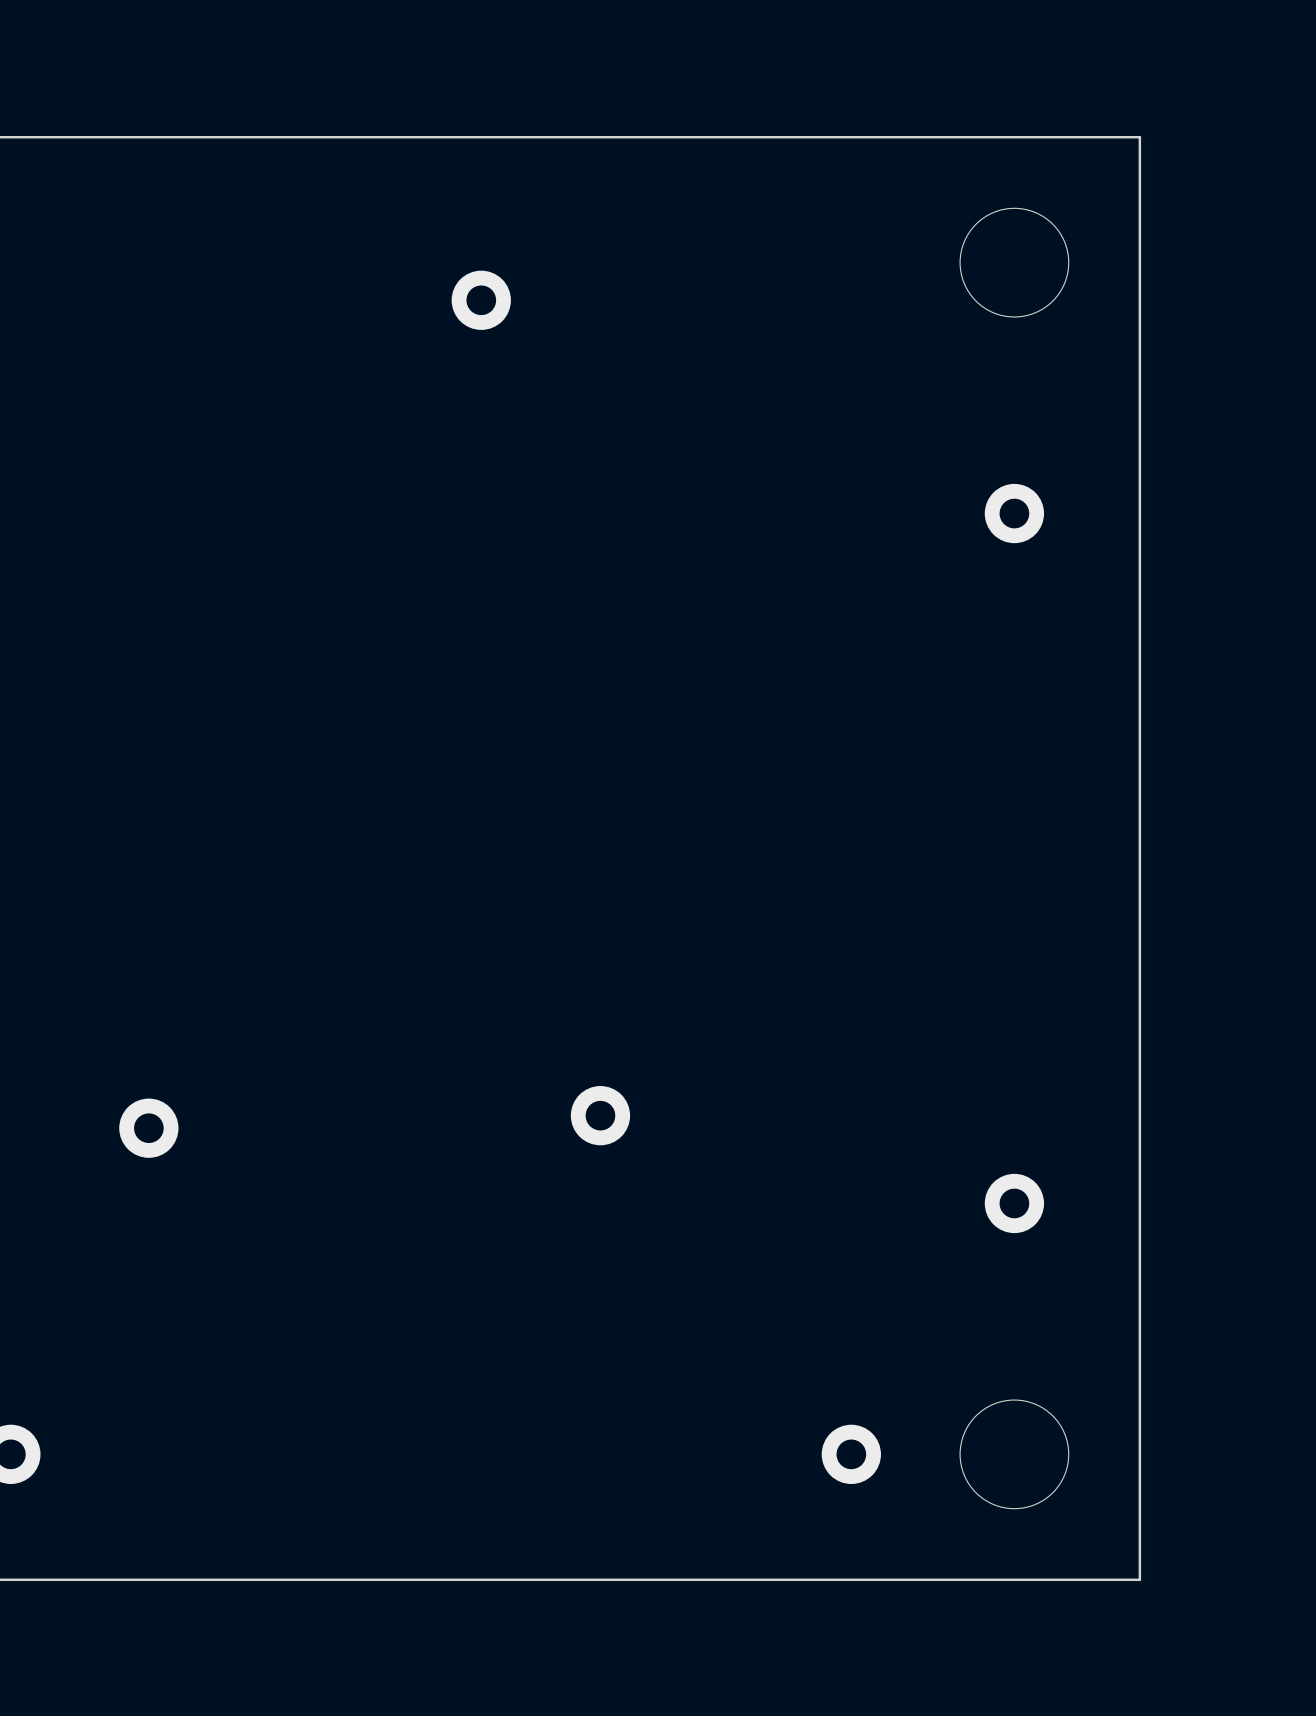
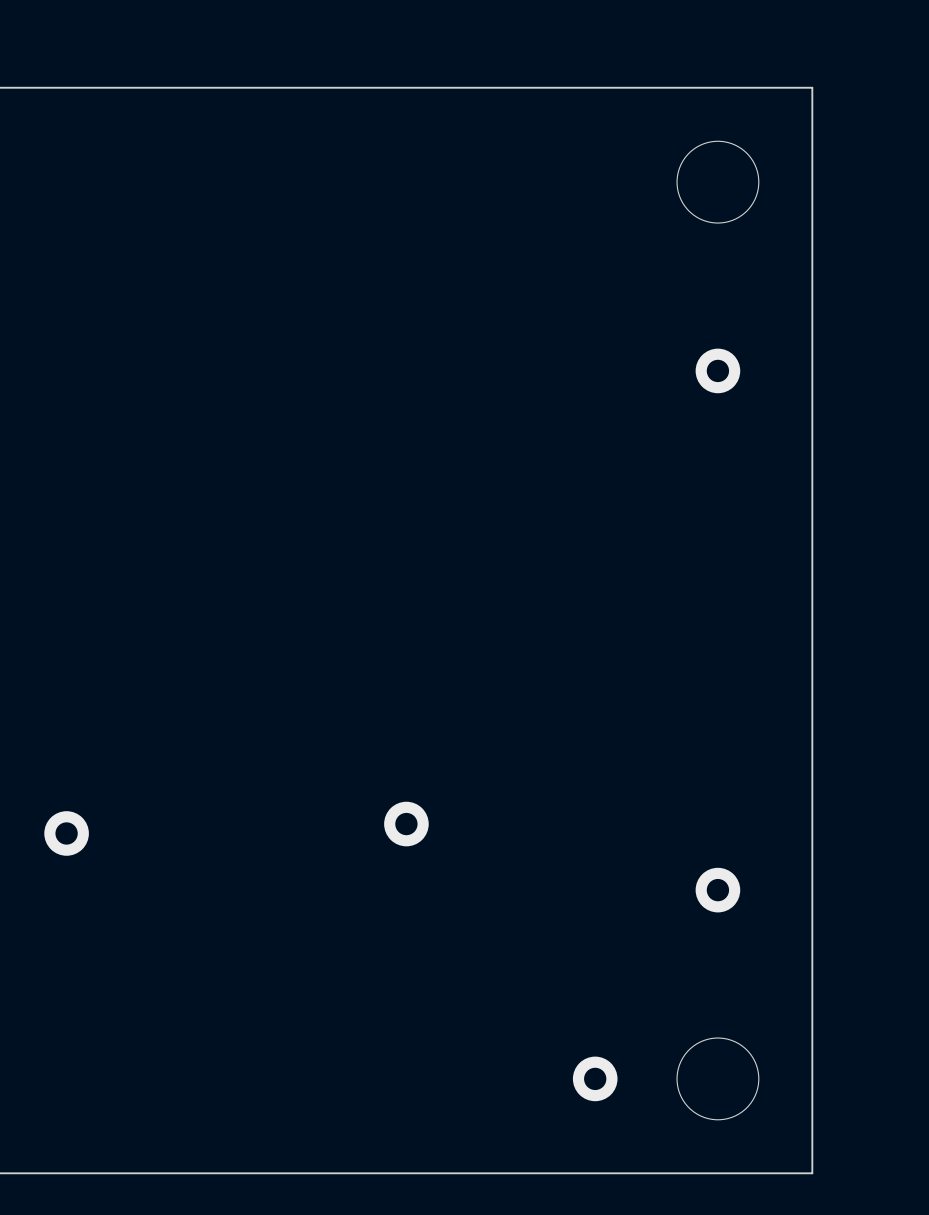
via: (481, 300) -> none

